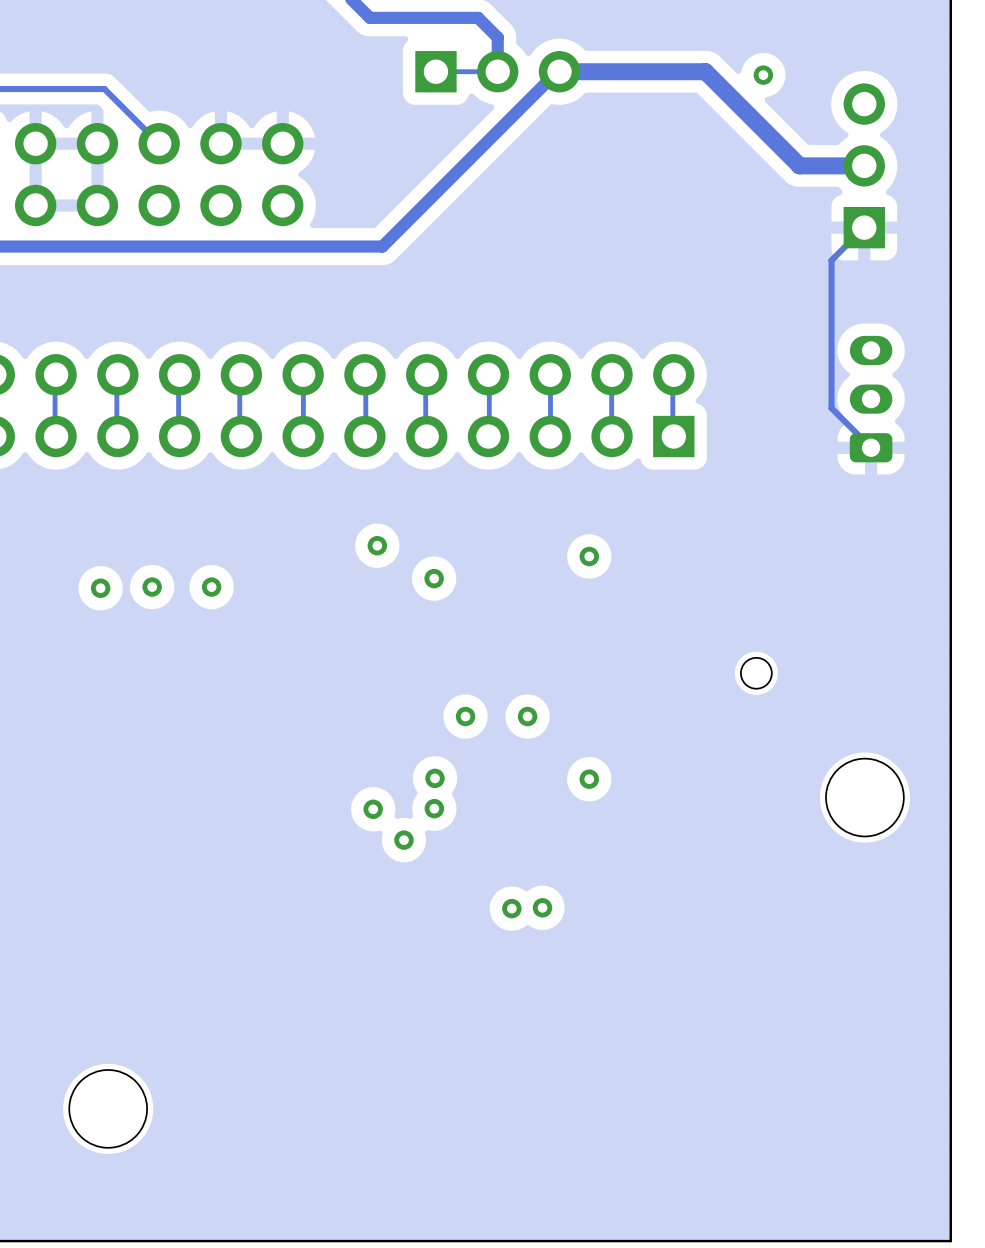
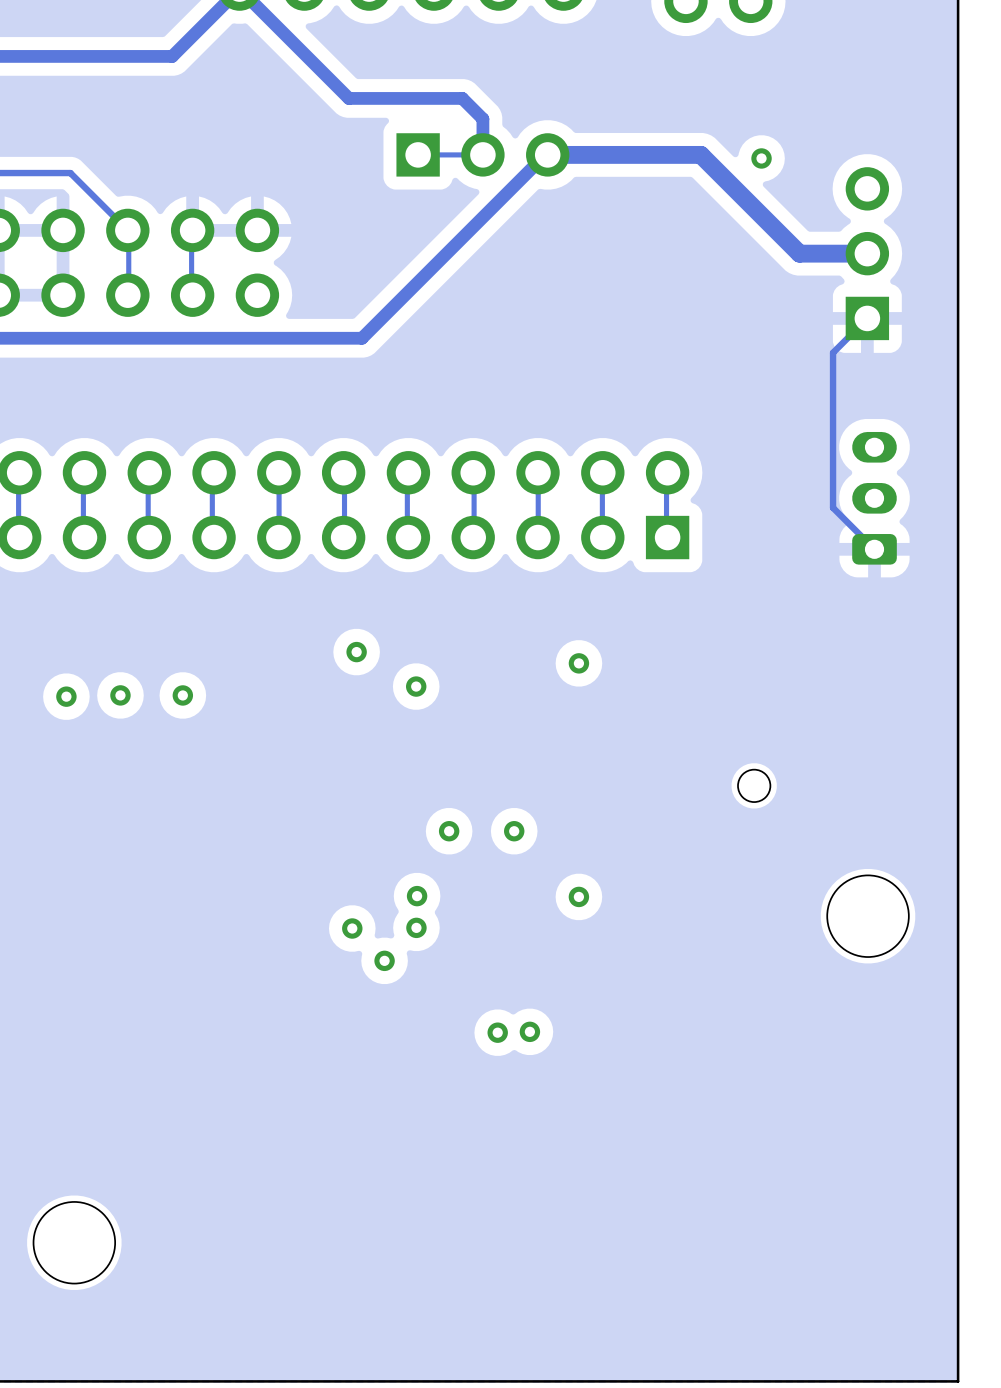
track: none -> (191, 244) (191, 277)
track: none -> (128, 245) (128, 278)

